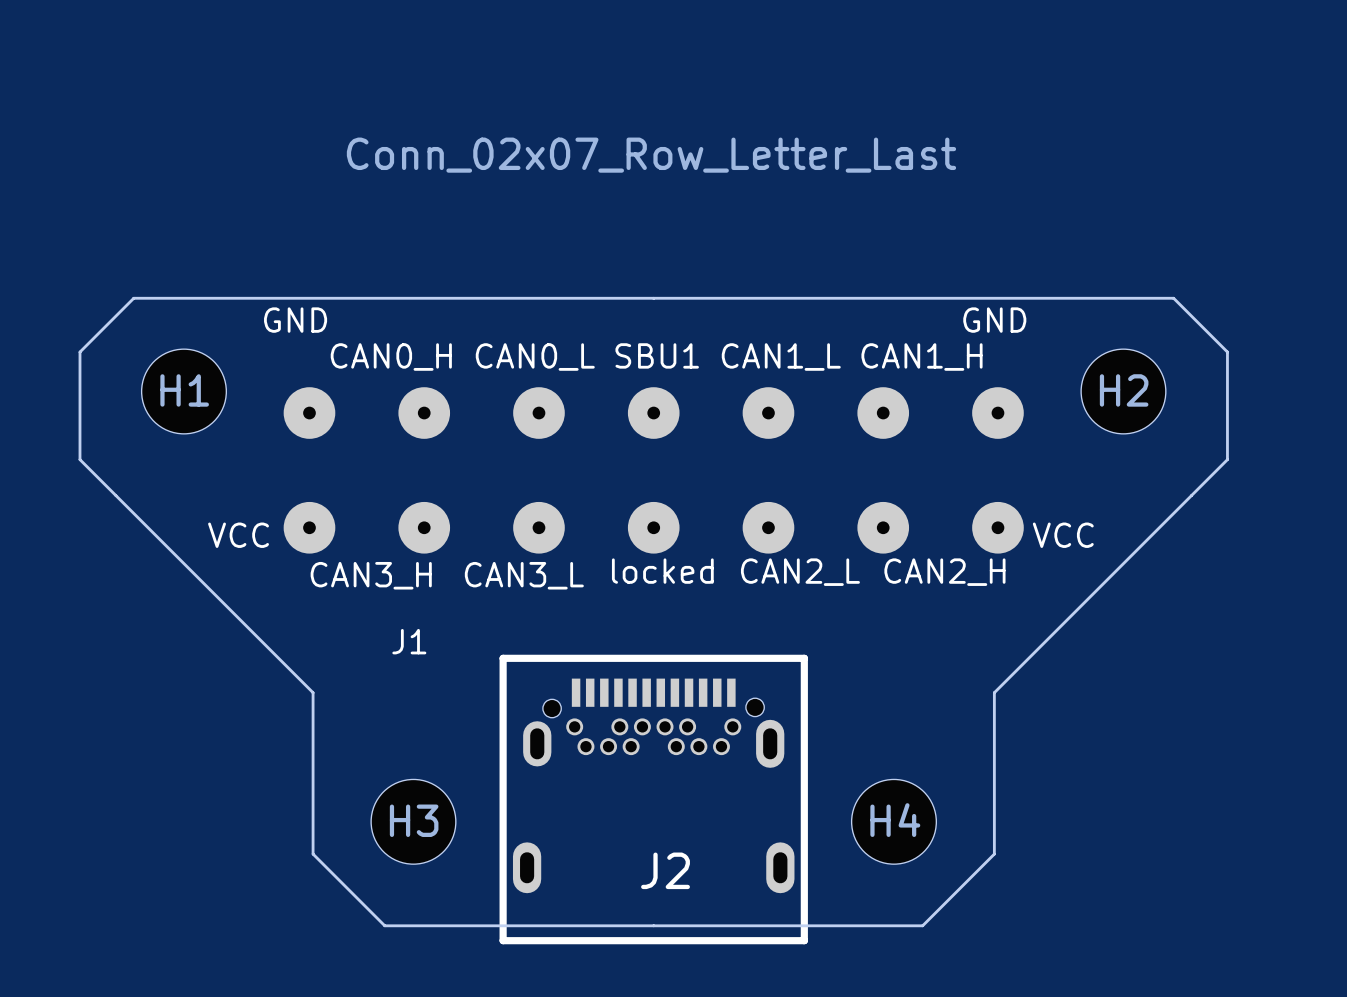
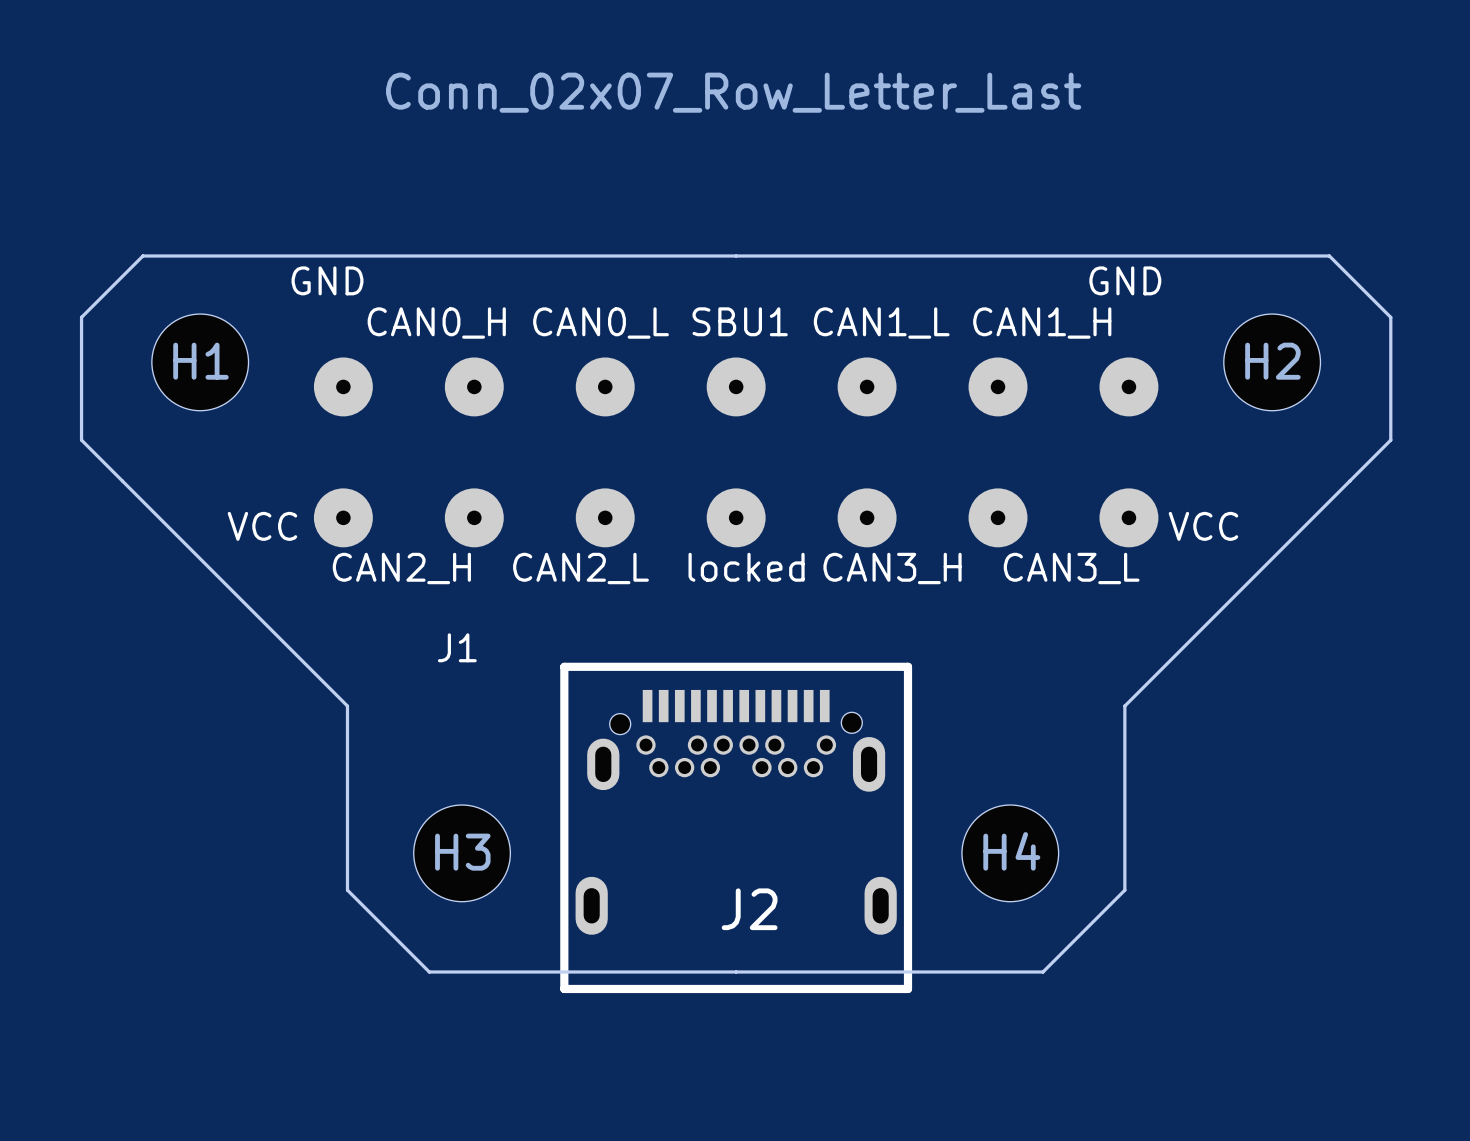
J1 text position: CAN2_L (800, 572) -> CAN2_L (580, 568)
J1 text position: CAN2_H (944, 572) -> CAN2_H (401, 568)
J1 text position: CAN3_H (371, 575) -> CAN3_H (892, 568)
J1 text position: CAN3_L (524, 575) -> CAN3_L (1071, 568)

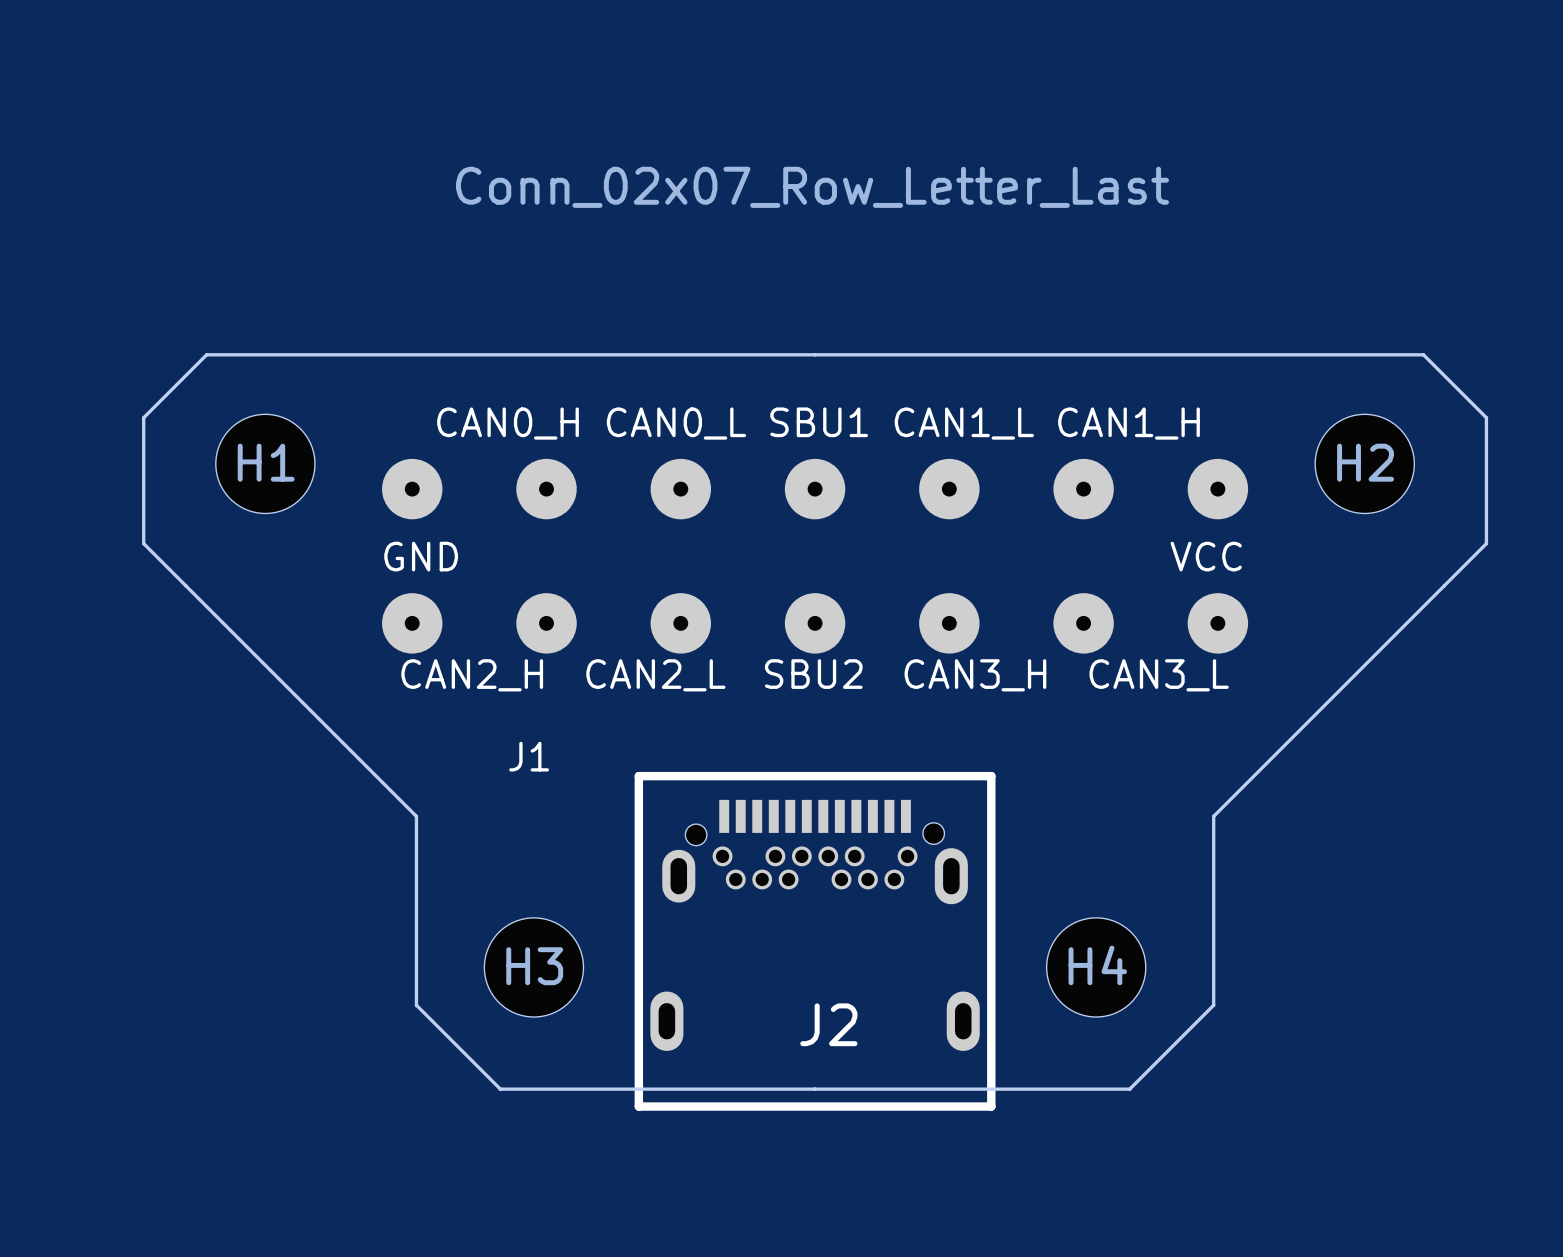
J1 text position: GND (327, 280) -> GND (421, 556)
text: GND (1125, 280) -> none
text: VCC (262, 526) -> none
J1 text position: VCC (1203, 526) -> VCC (1206, 556)
J1 text: locked (746, 567) -> SBU2 (813, 674)

